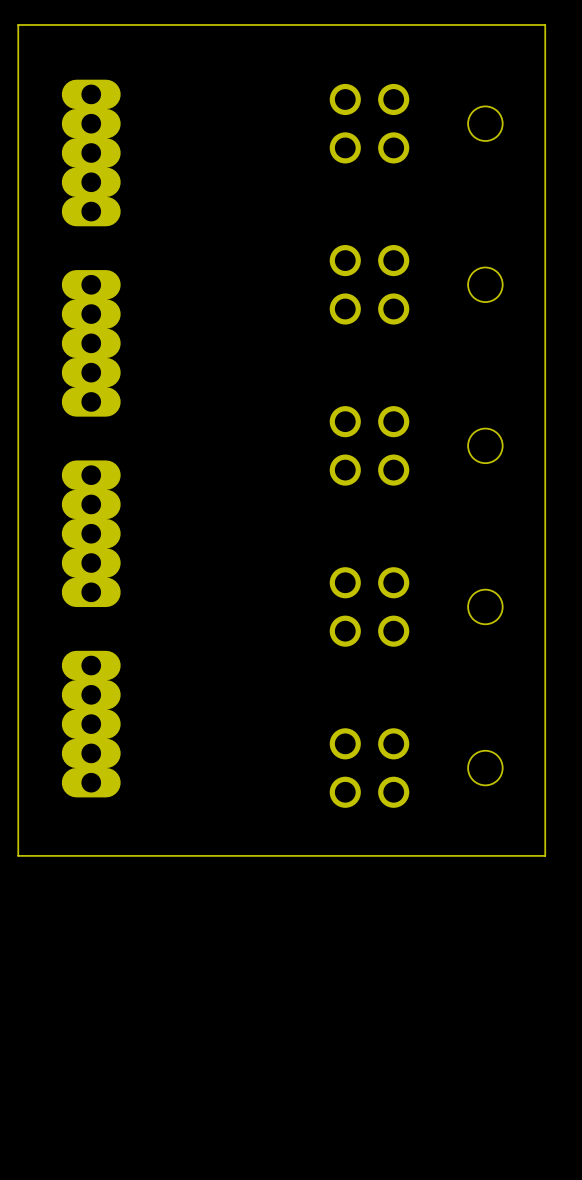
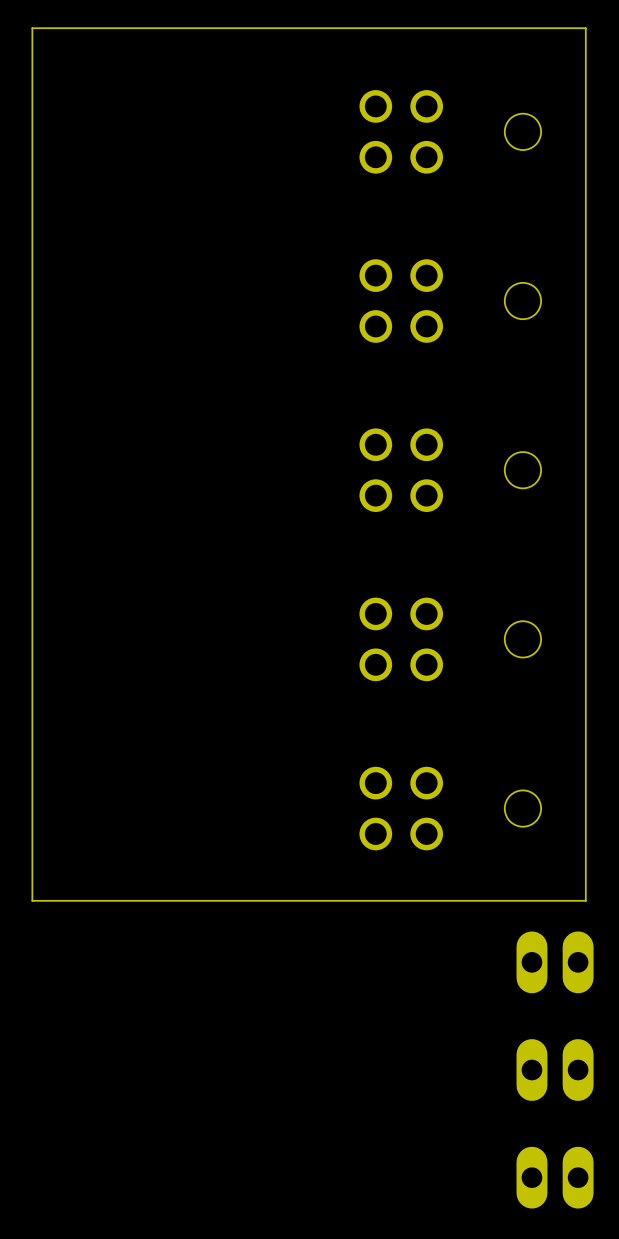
part: (91, 152) -> none
part: (91, 343) -> none
part: (91, 533) -> none
part: (91, 724) -> none
part: none -> (555, 962)
part: none -> (555, 1070)
part: none -> (555, 1177)

